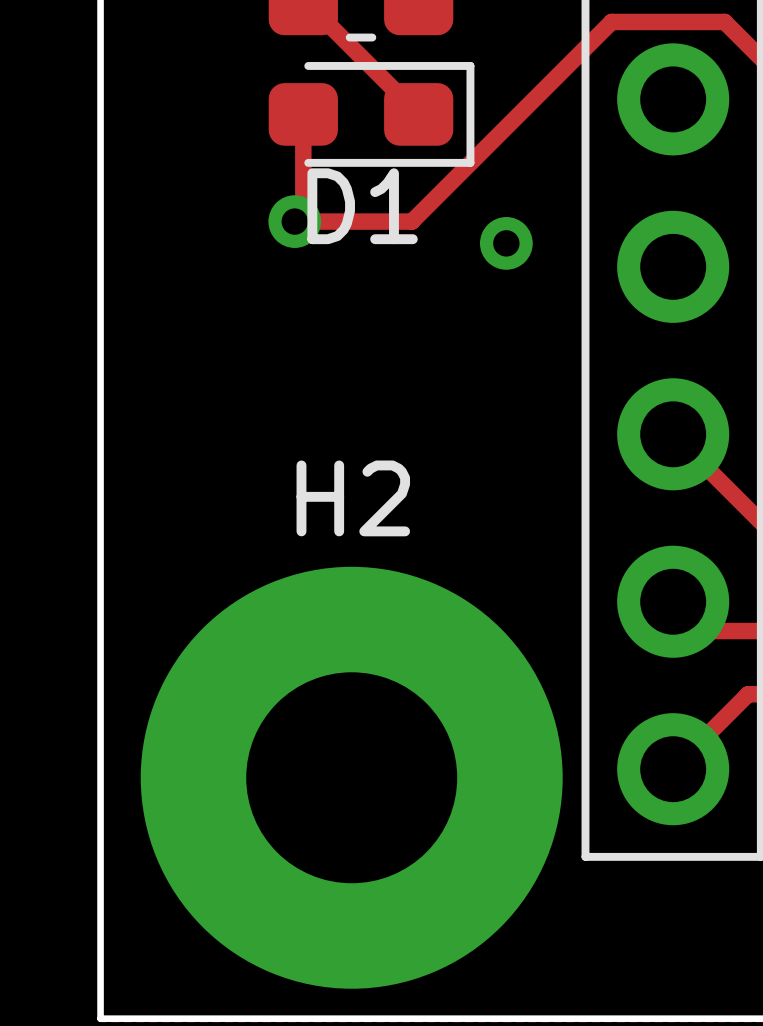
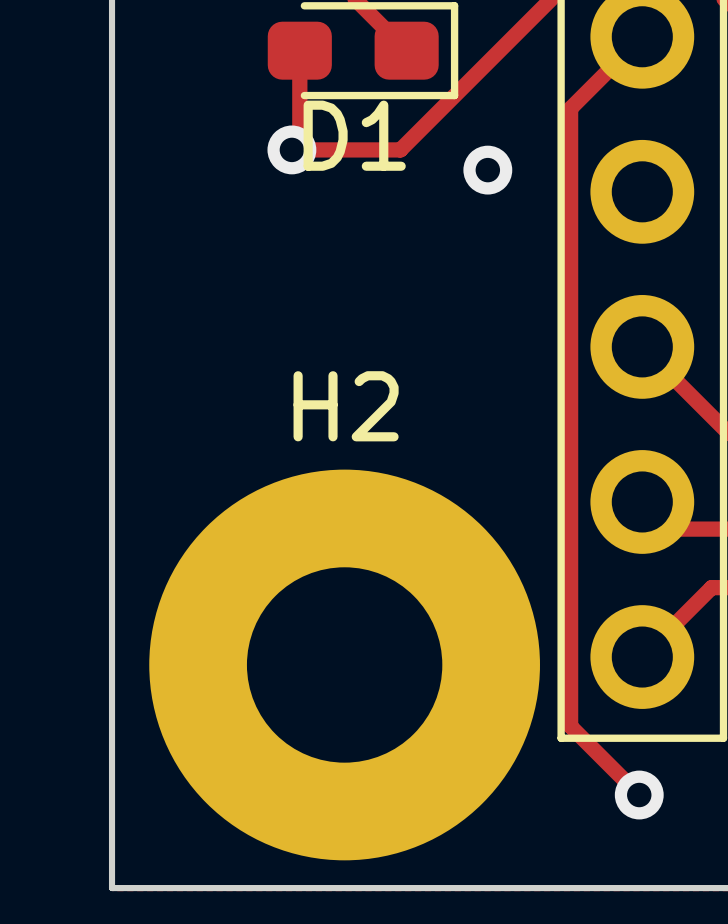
track: none -> (642, 36) (570, 108) (570, 726) (639, 795)
via: none -> (639, 795)

